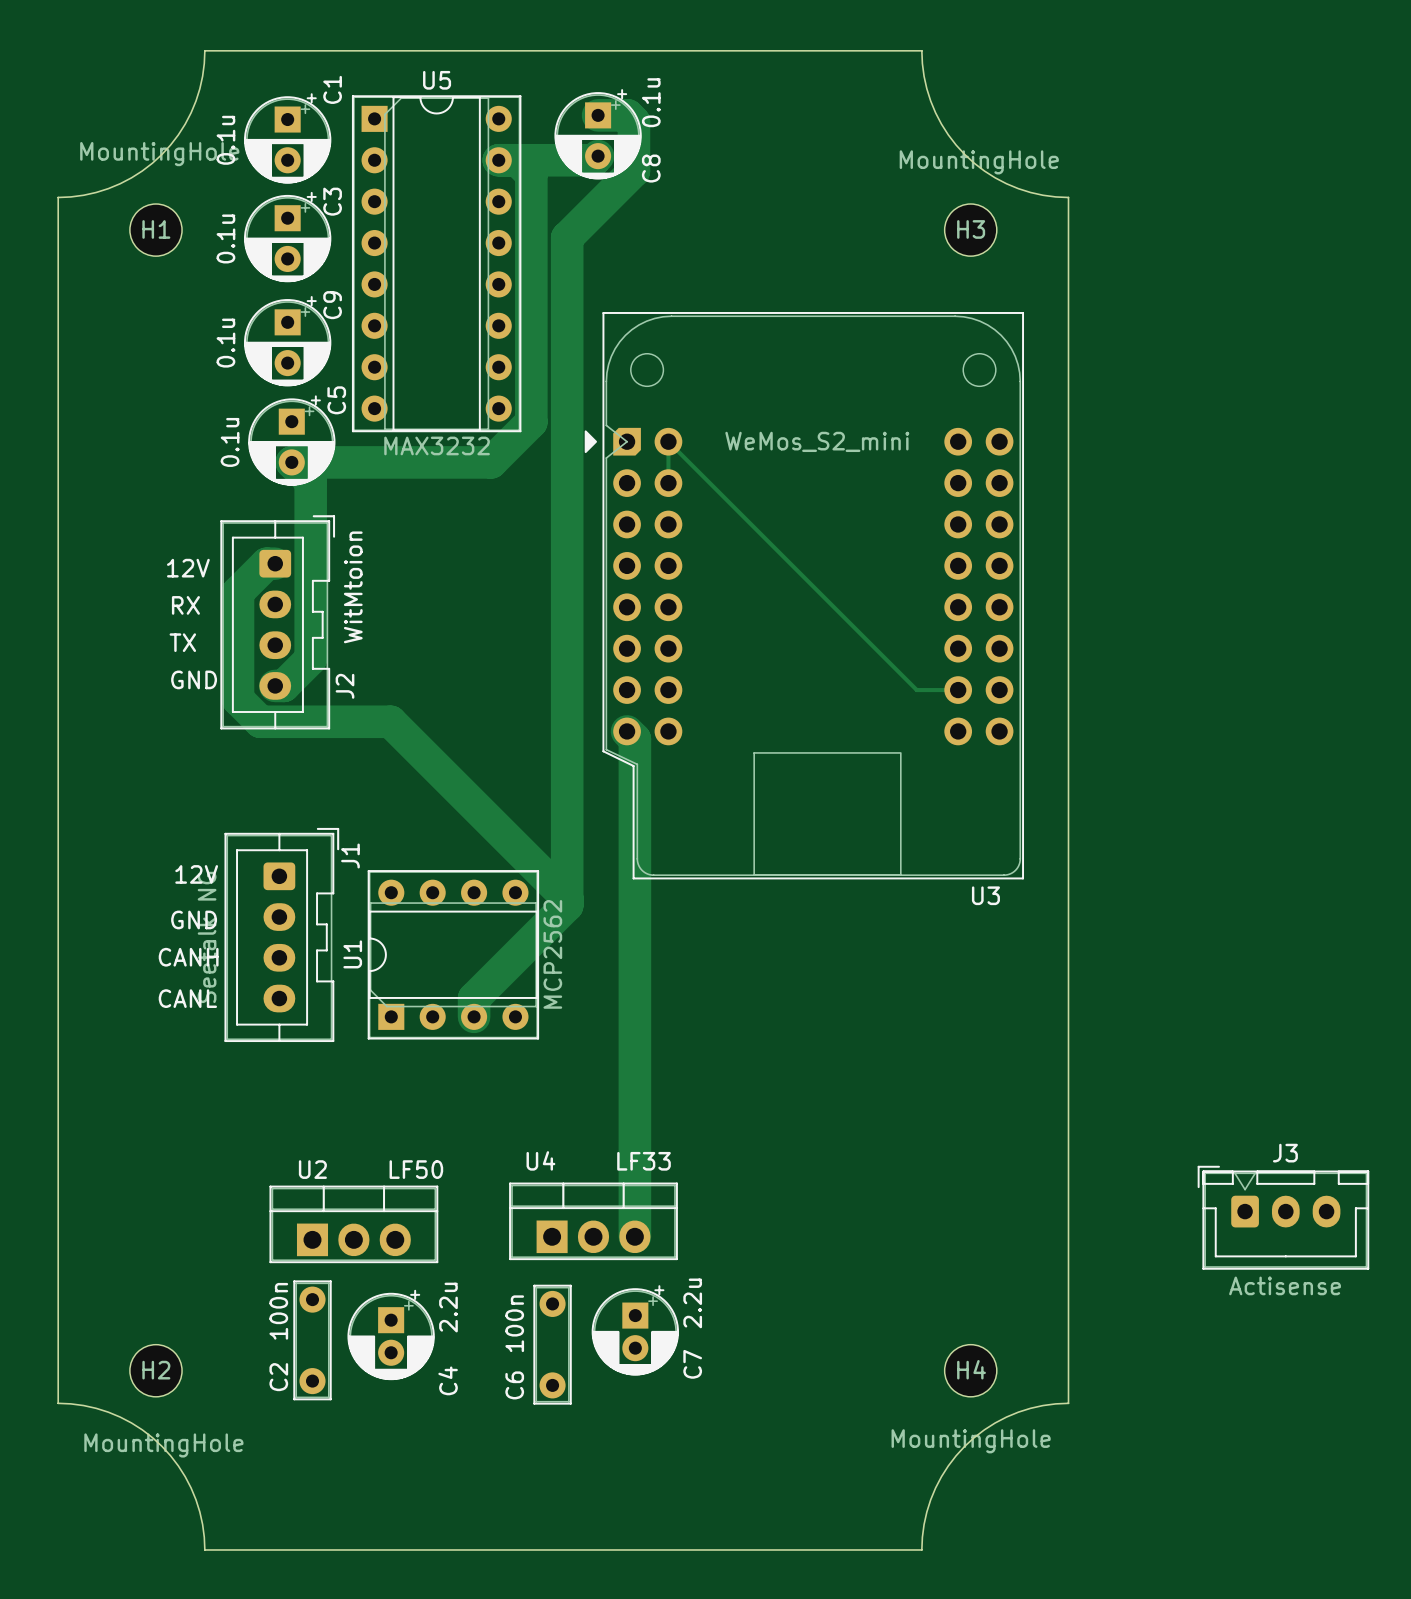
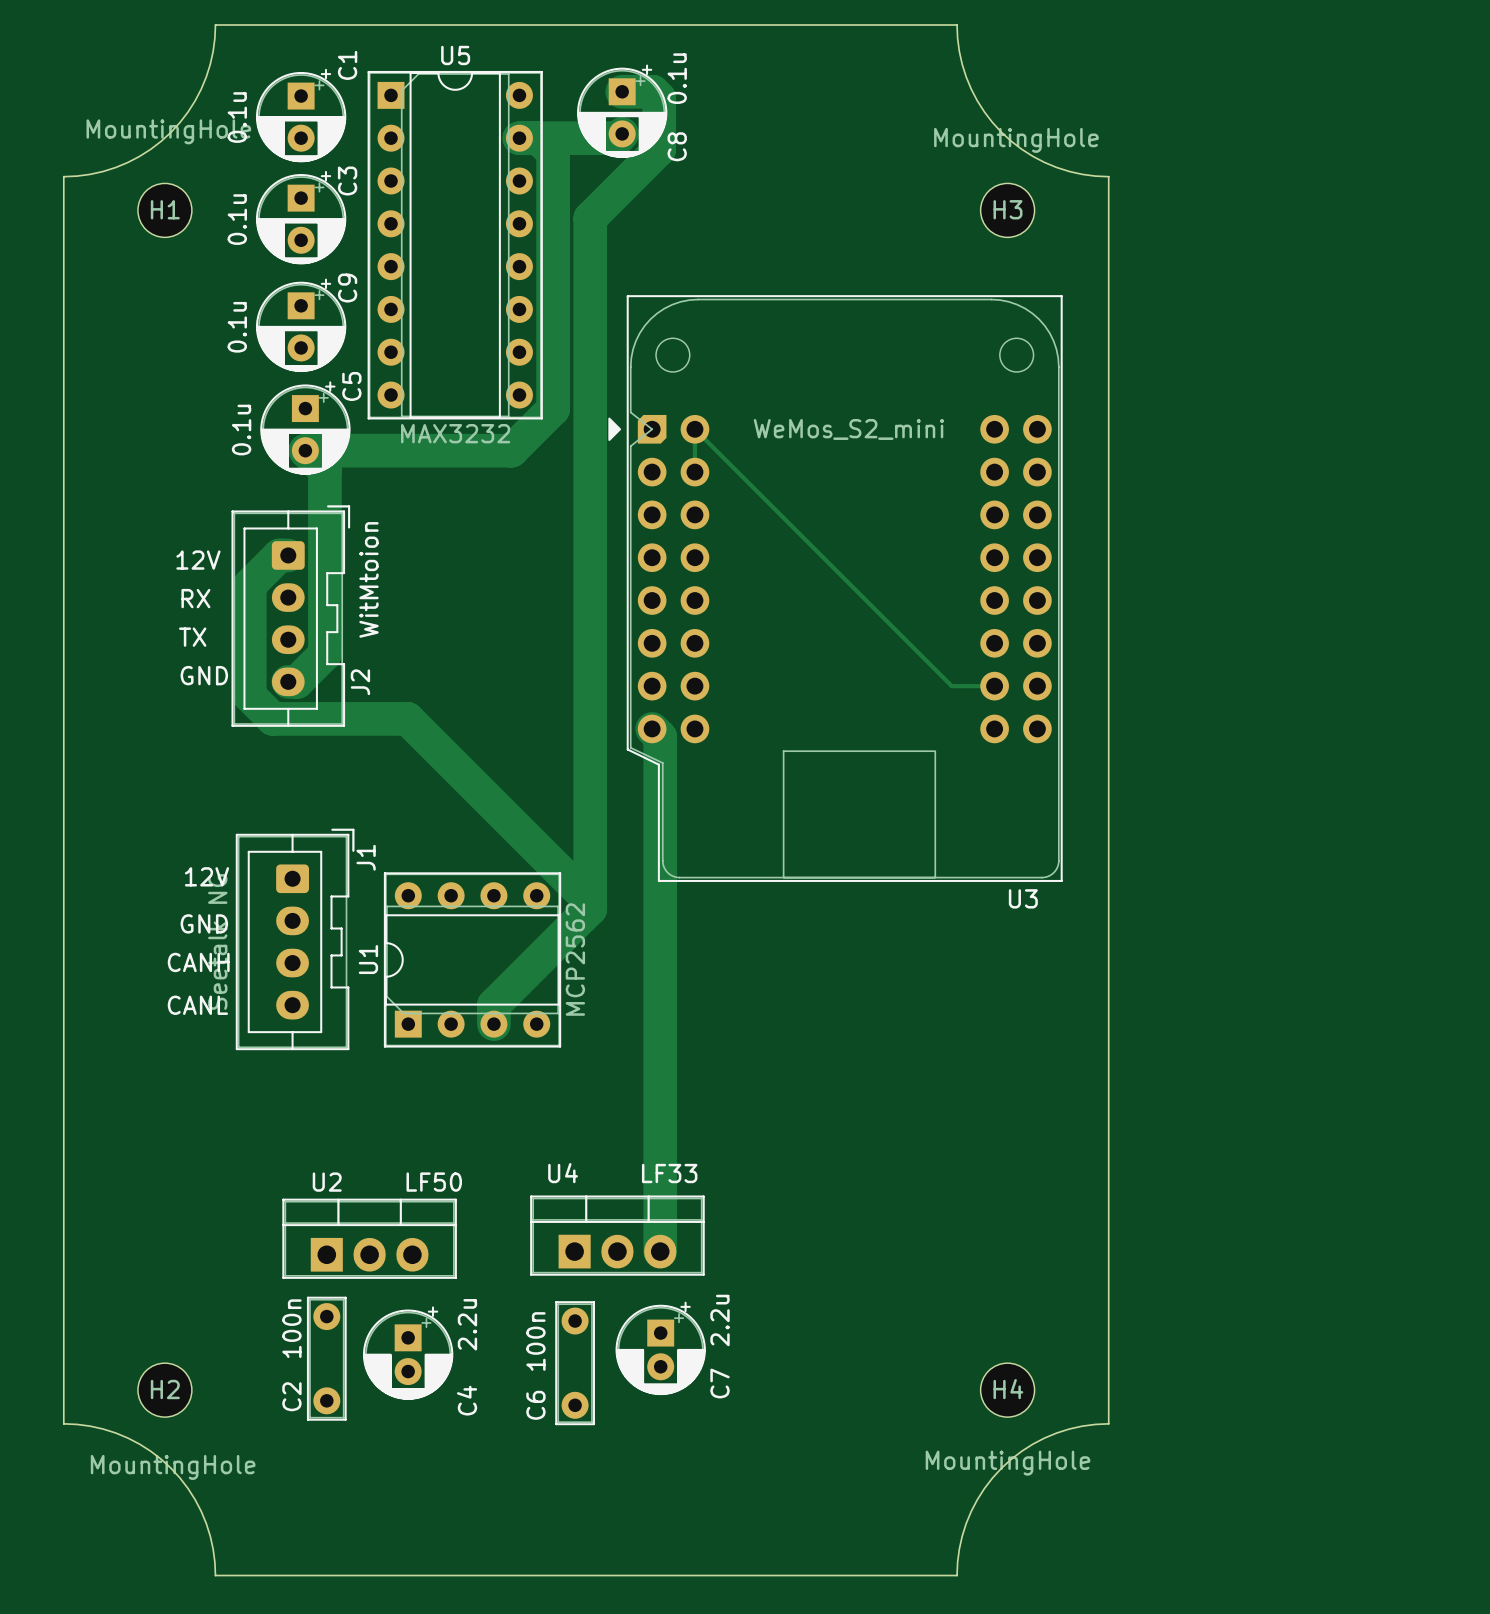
J3: Actisense (1283, 1217) -> none

